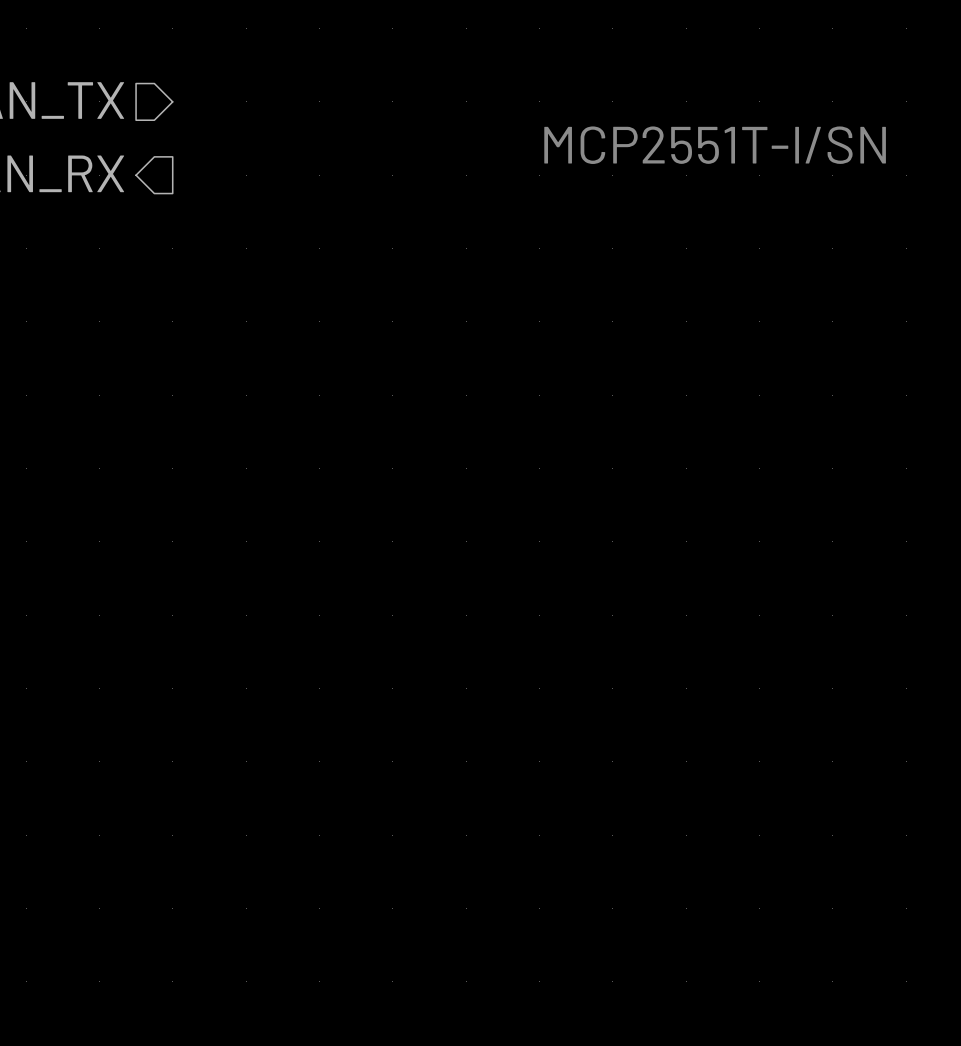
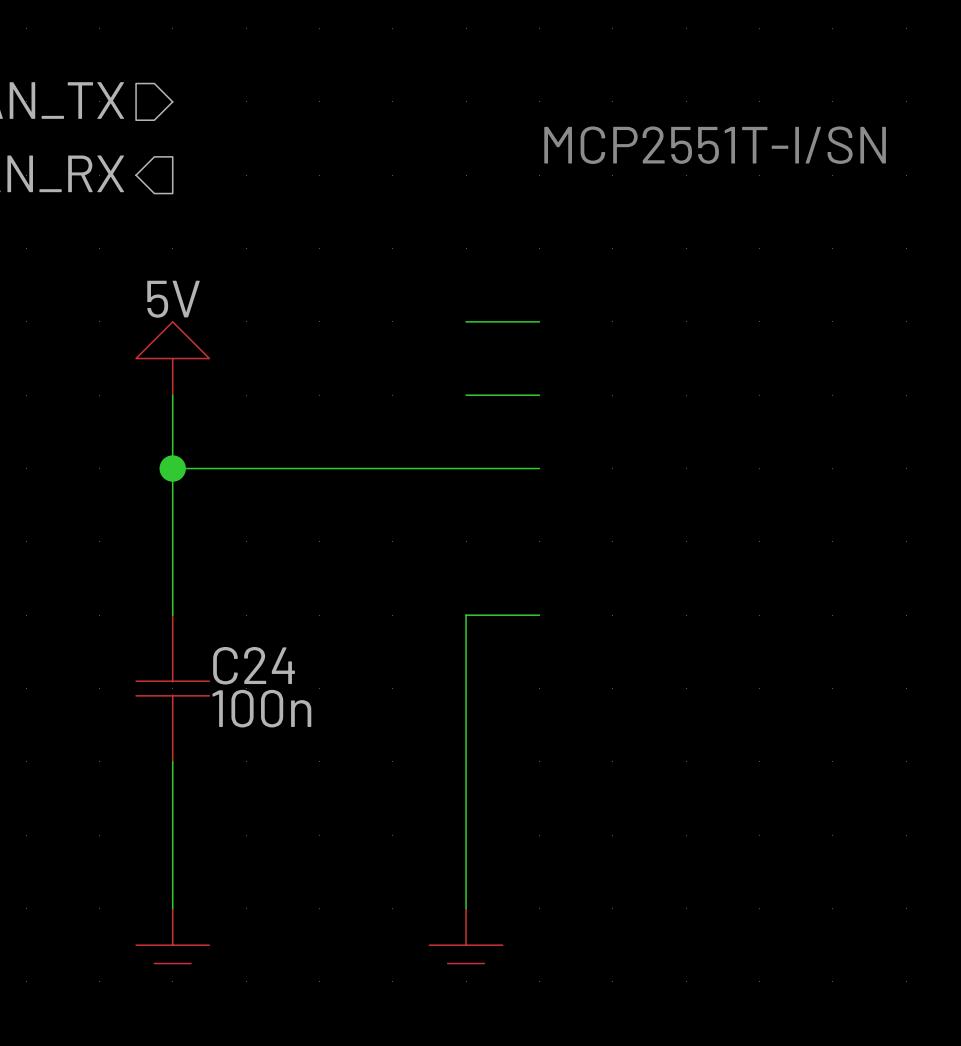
wire: none -> (466, 321) (539, 321)
power symbol: none -> 5V (172, 358)
wire: none -> (172, 395) (172, 615)
wire: none -> (466, 395) (539, 395)
wire: none -> (172, 468) (539, 468)
junction: none -> (172, 468)
wire: none -> (539, 615) (466, 615) (466, 908)
C24: none -> 100n (172, 688)
wire: none -> (172, 761) (172, 908)
power symbol: none -> (172, 945)
power symbol: none -> (466, 945)

